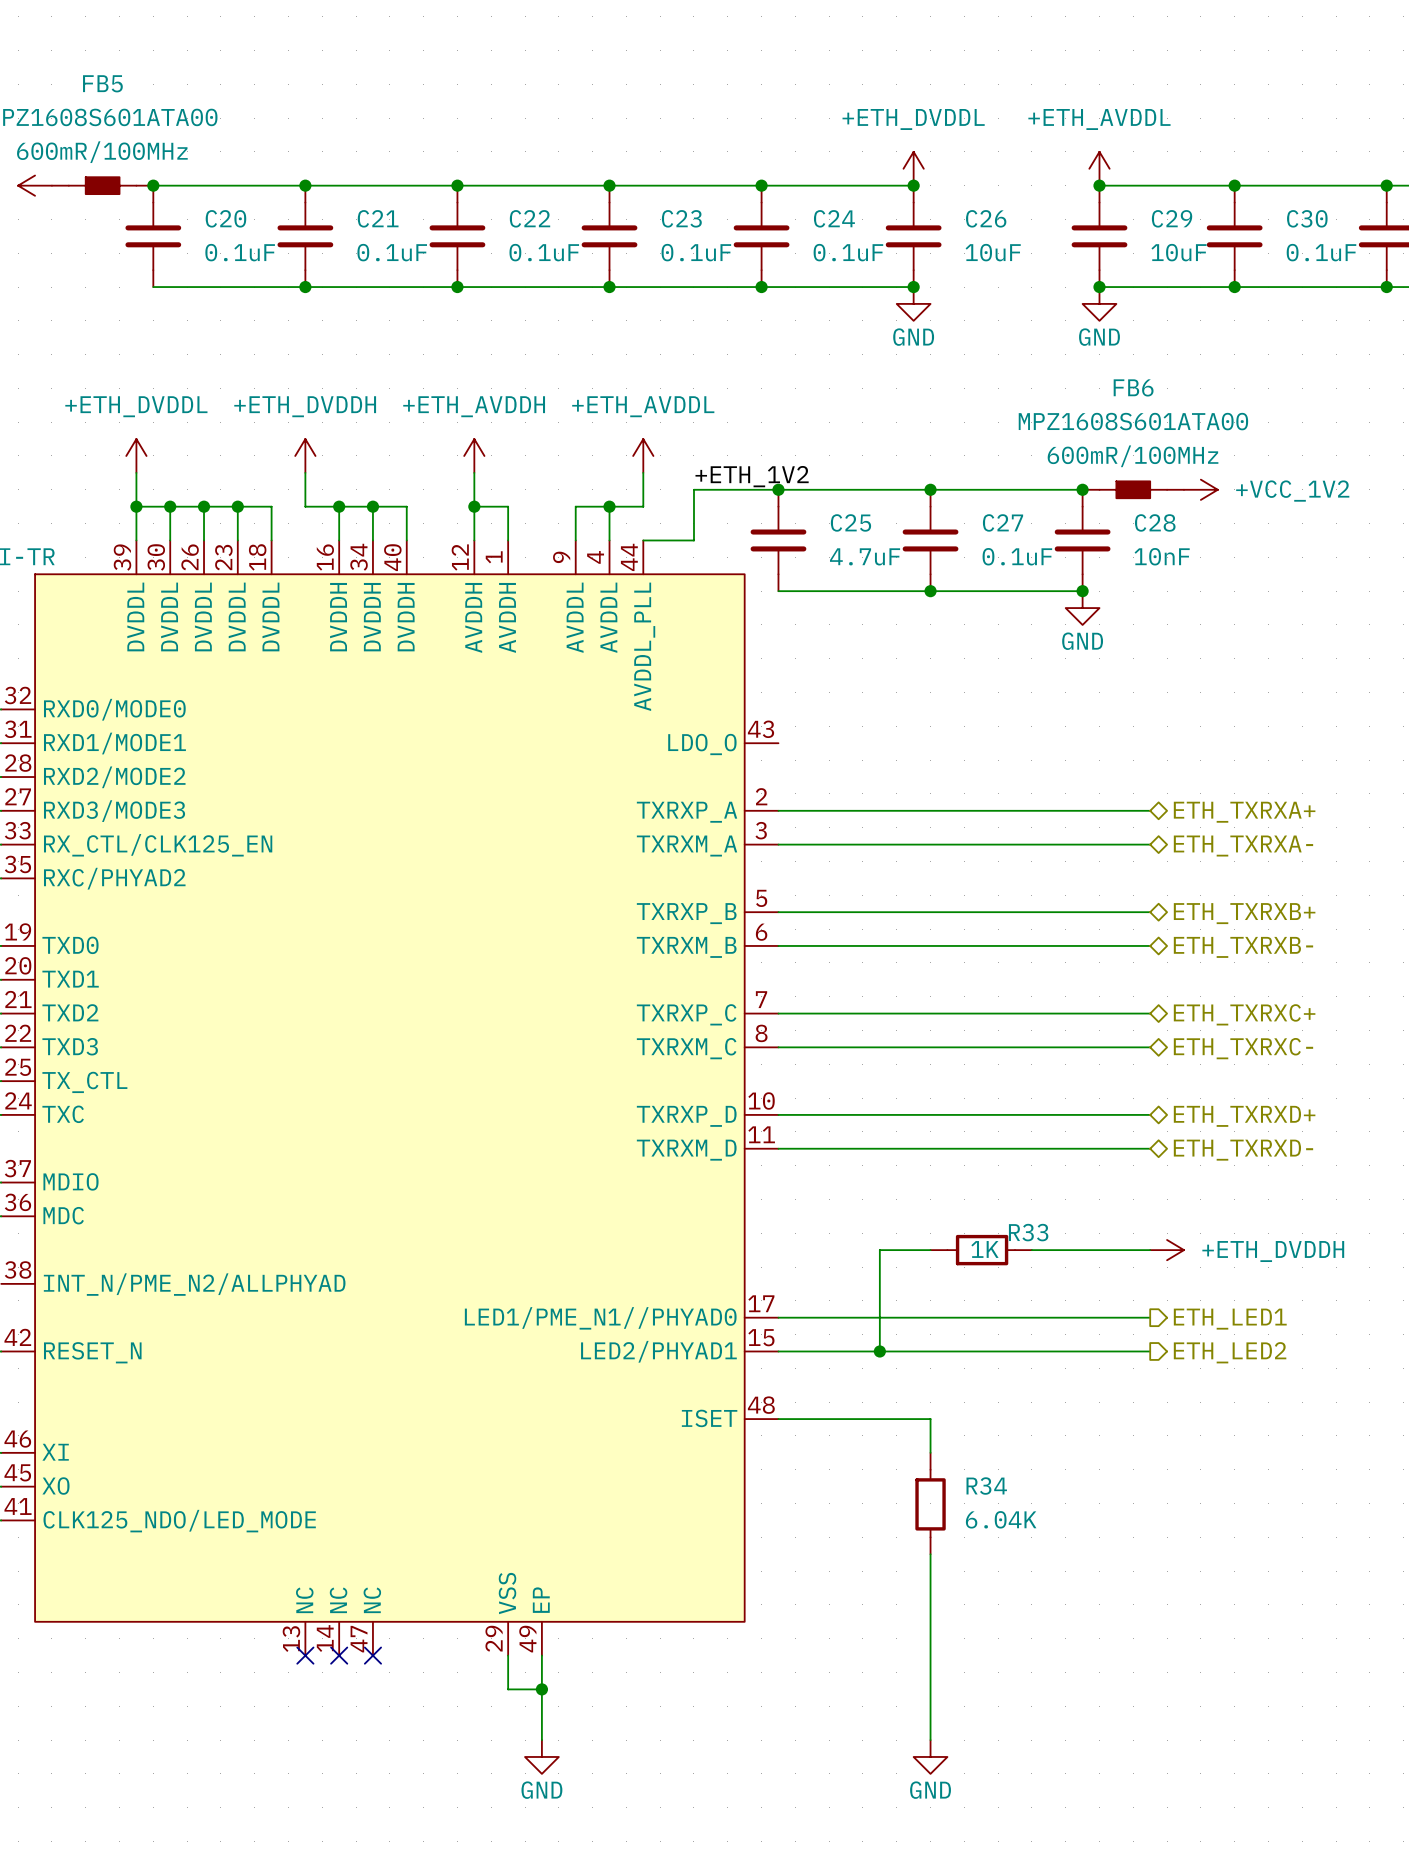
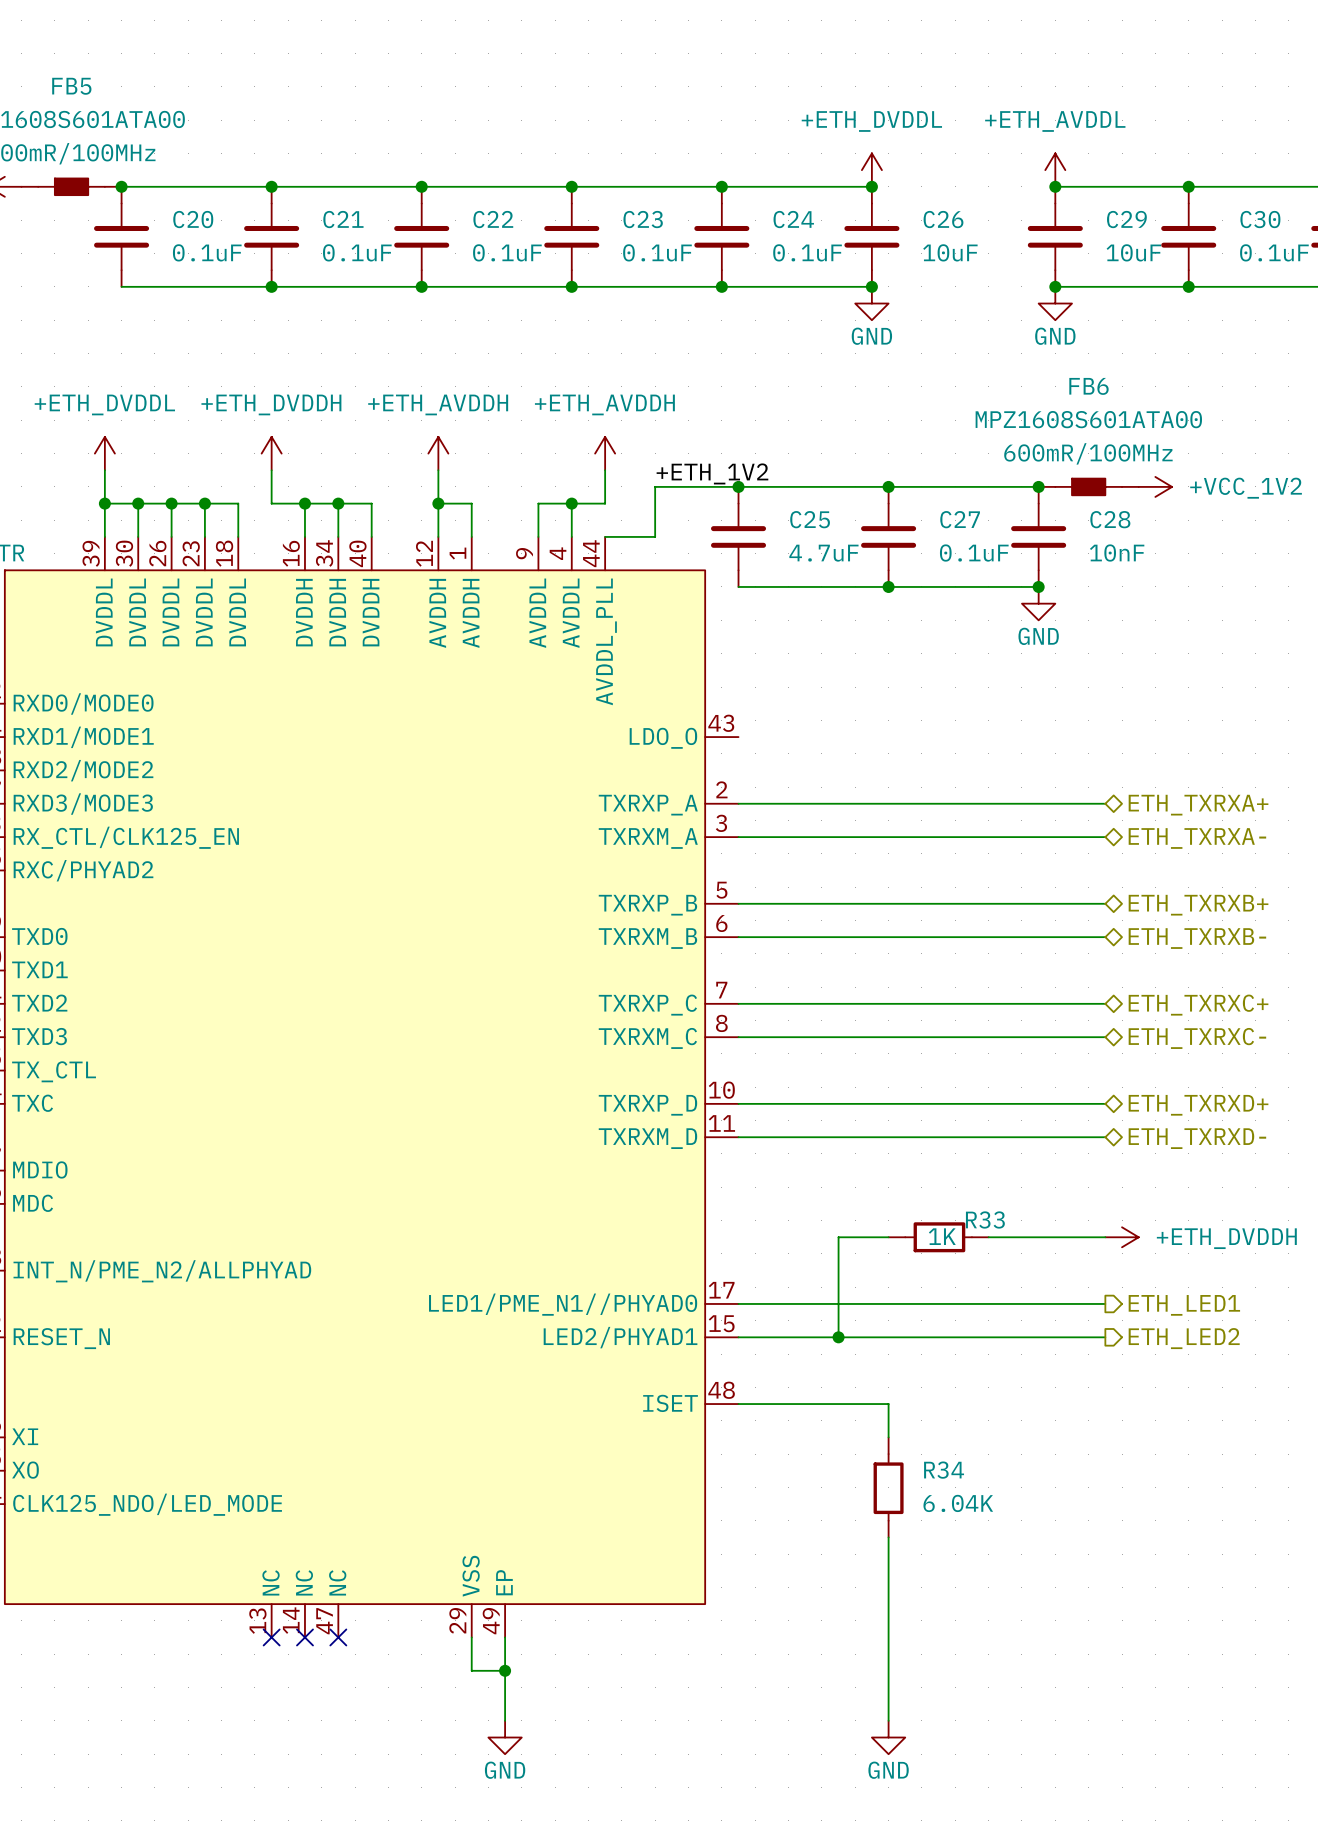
power symbol: +ETH_AVDDL (643, 455) -> +ETH_AVDDH (605, 453)

